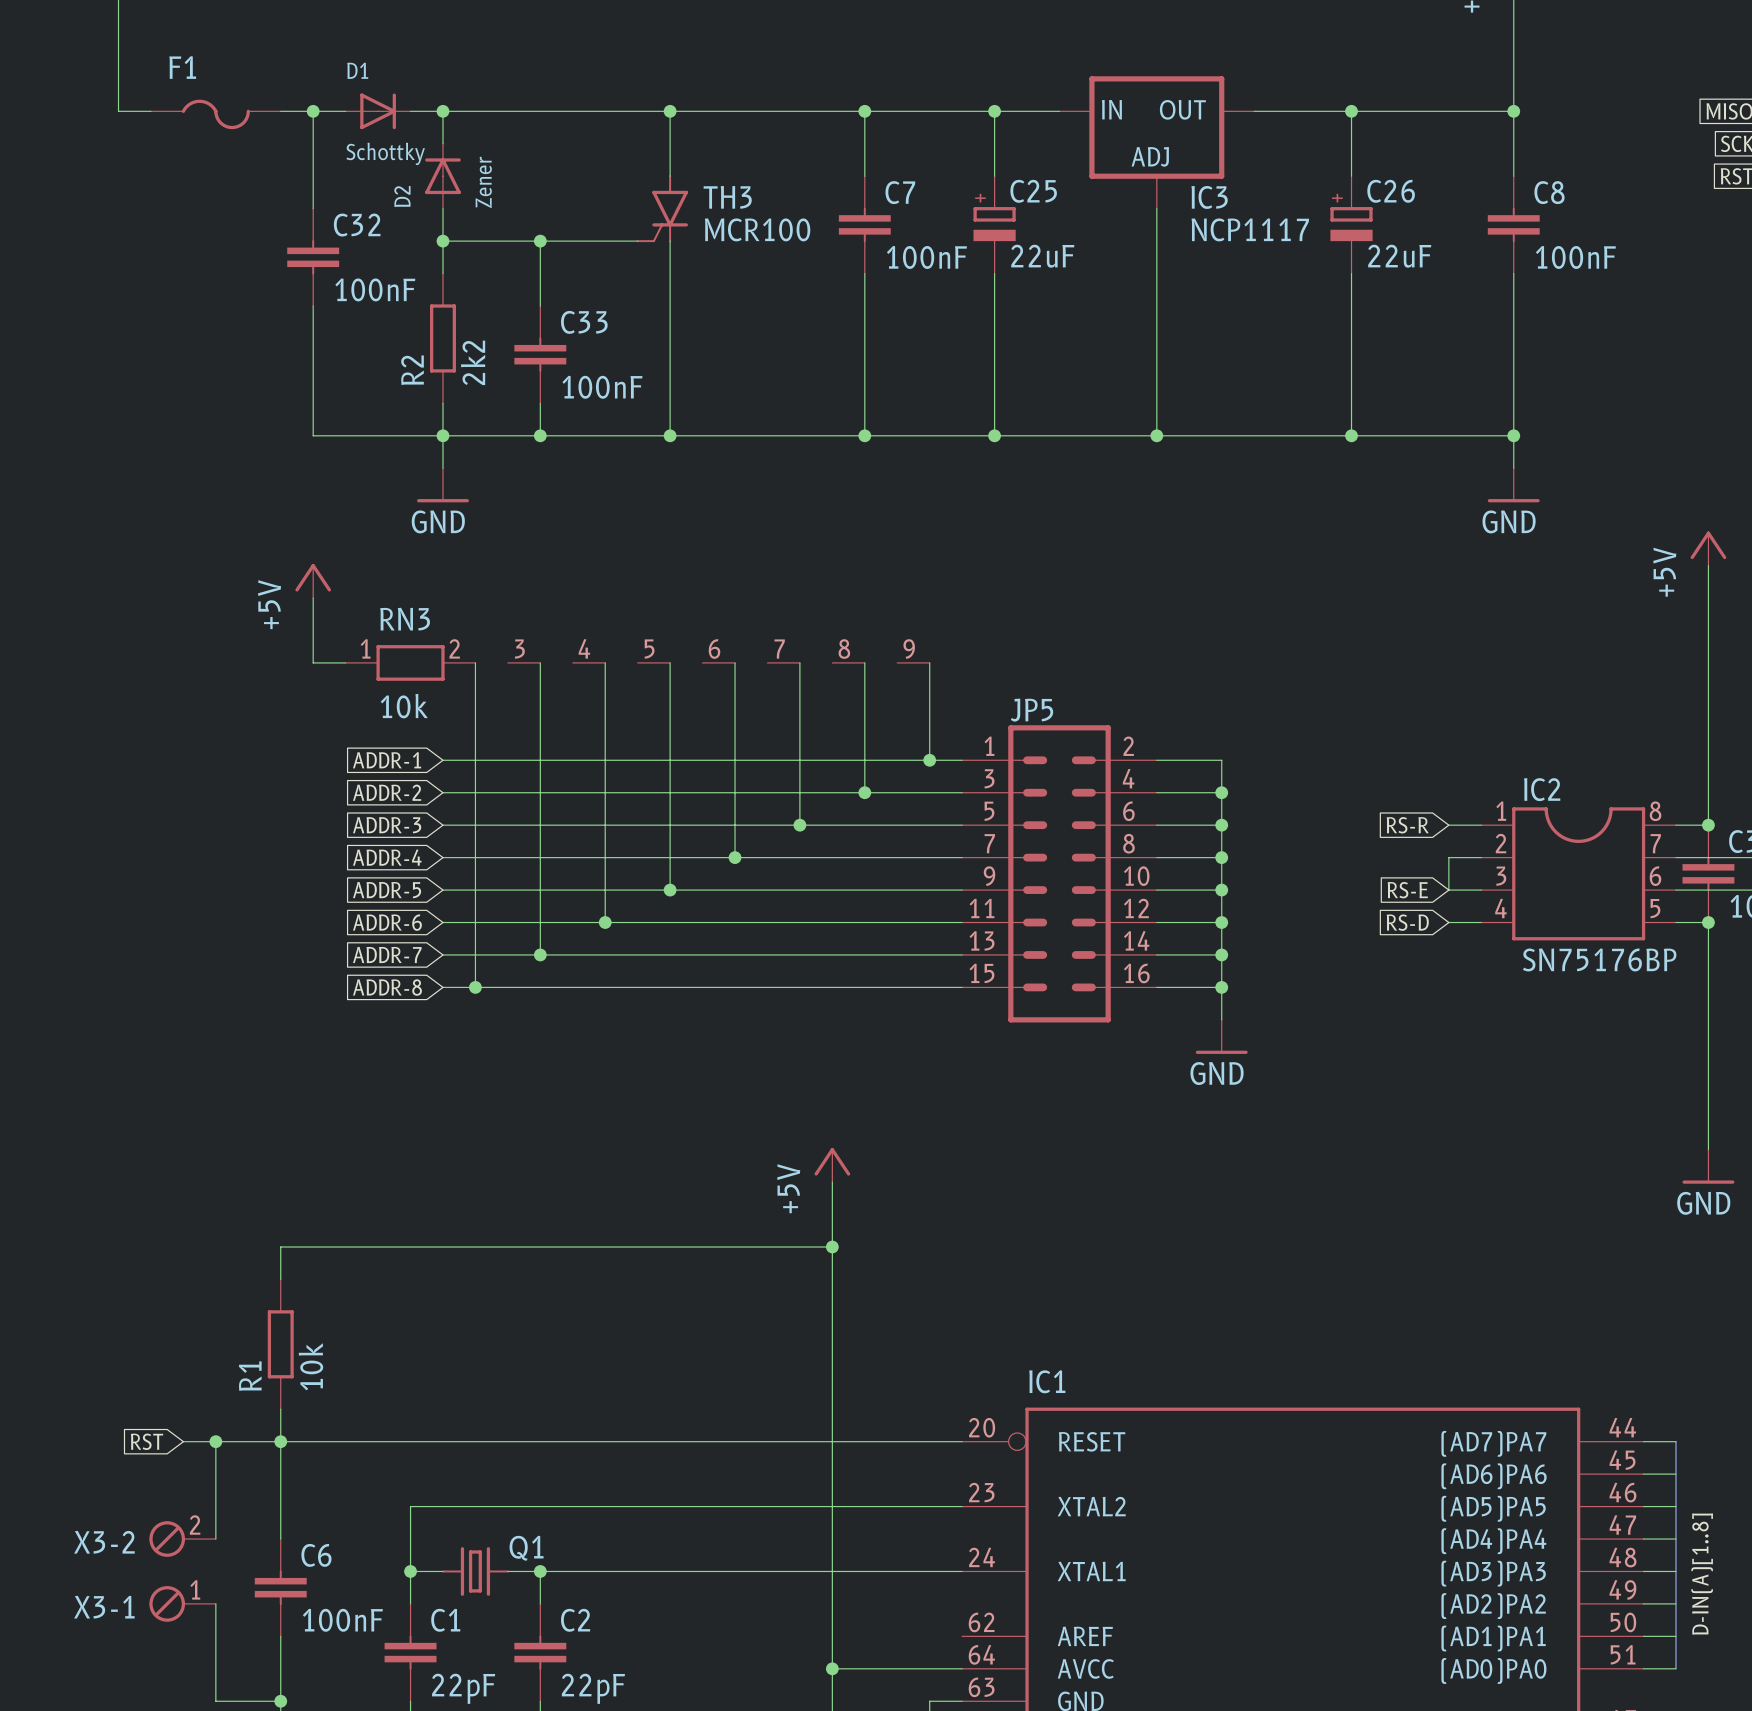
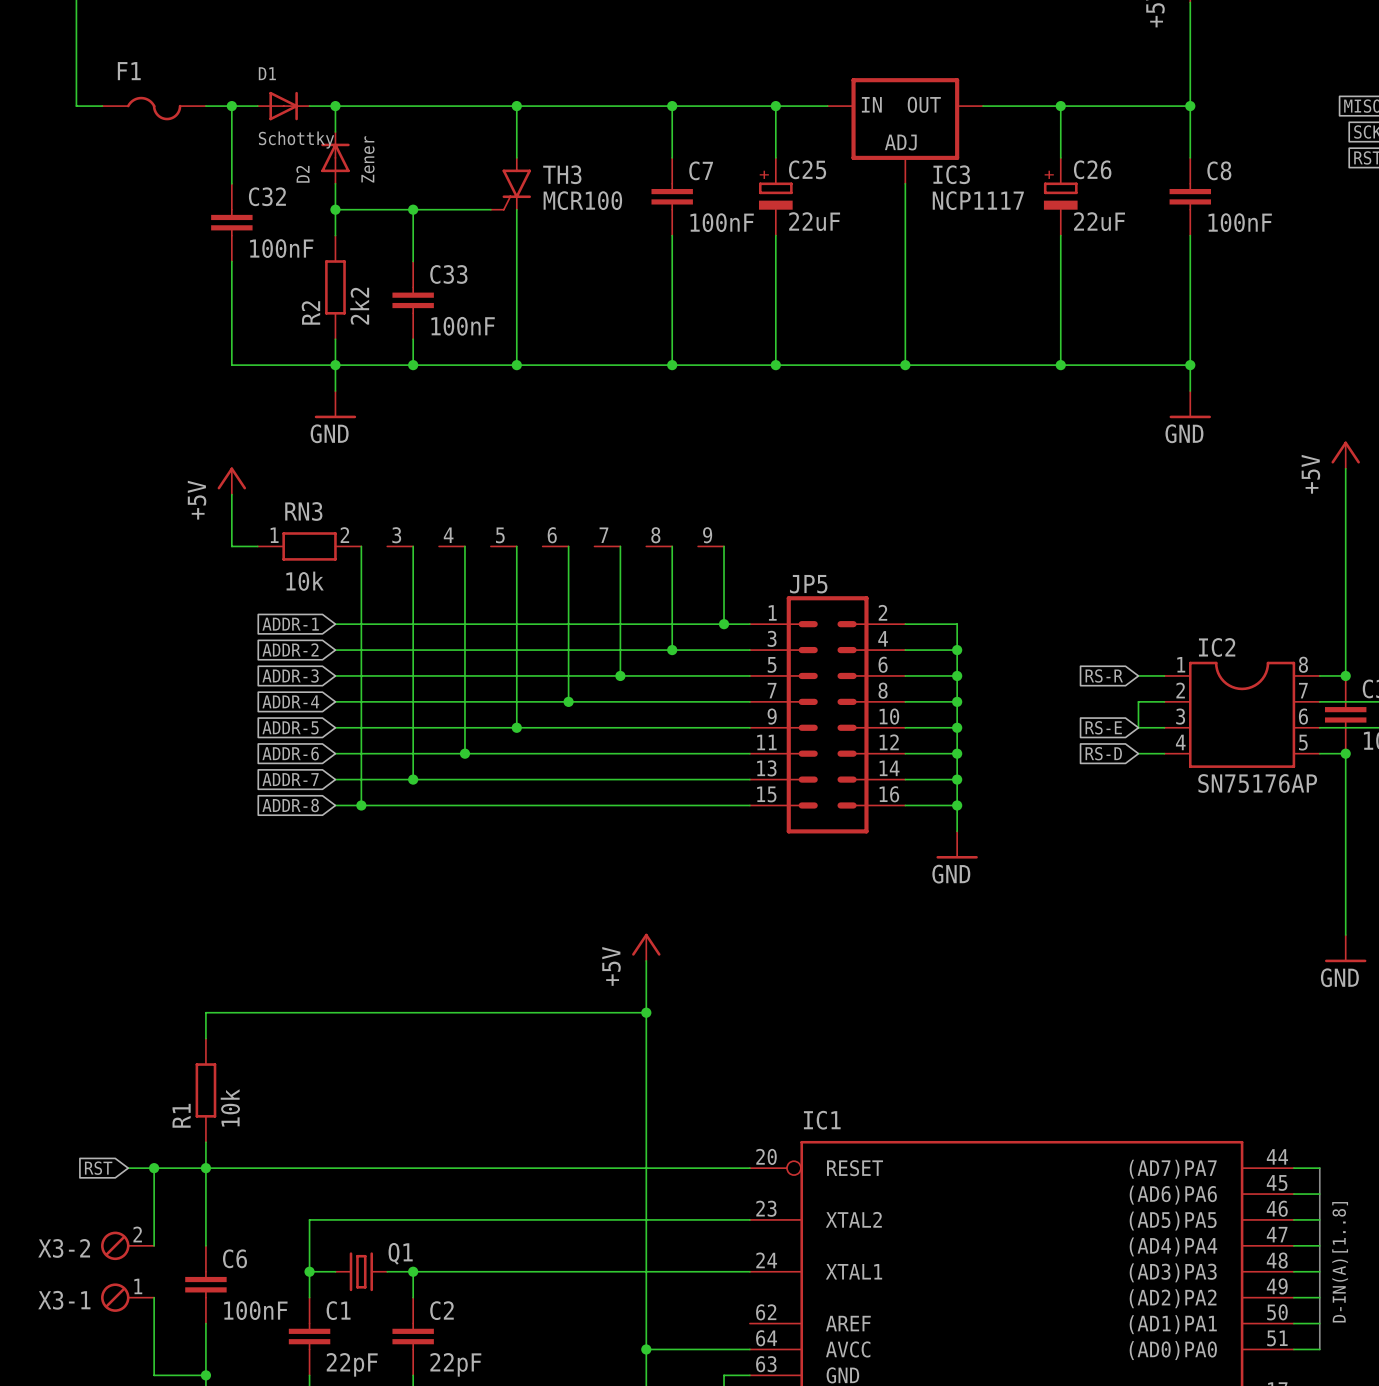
IC2 value: SN75176BP (1599, 959) -> SN75176AP (1257, 783)

